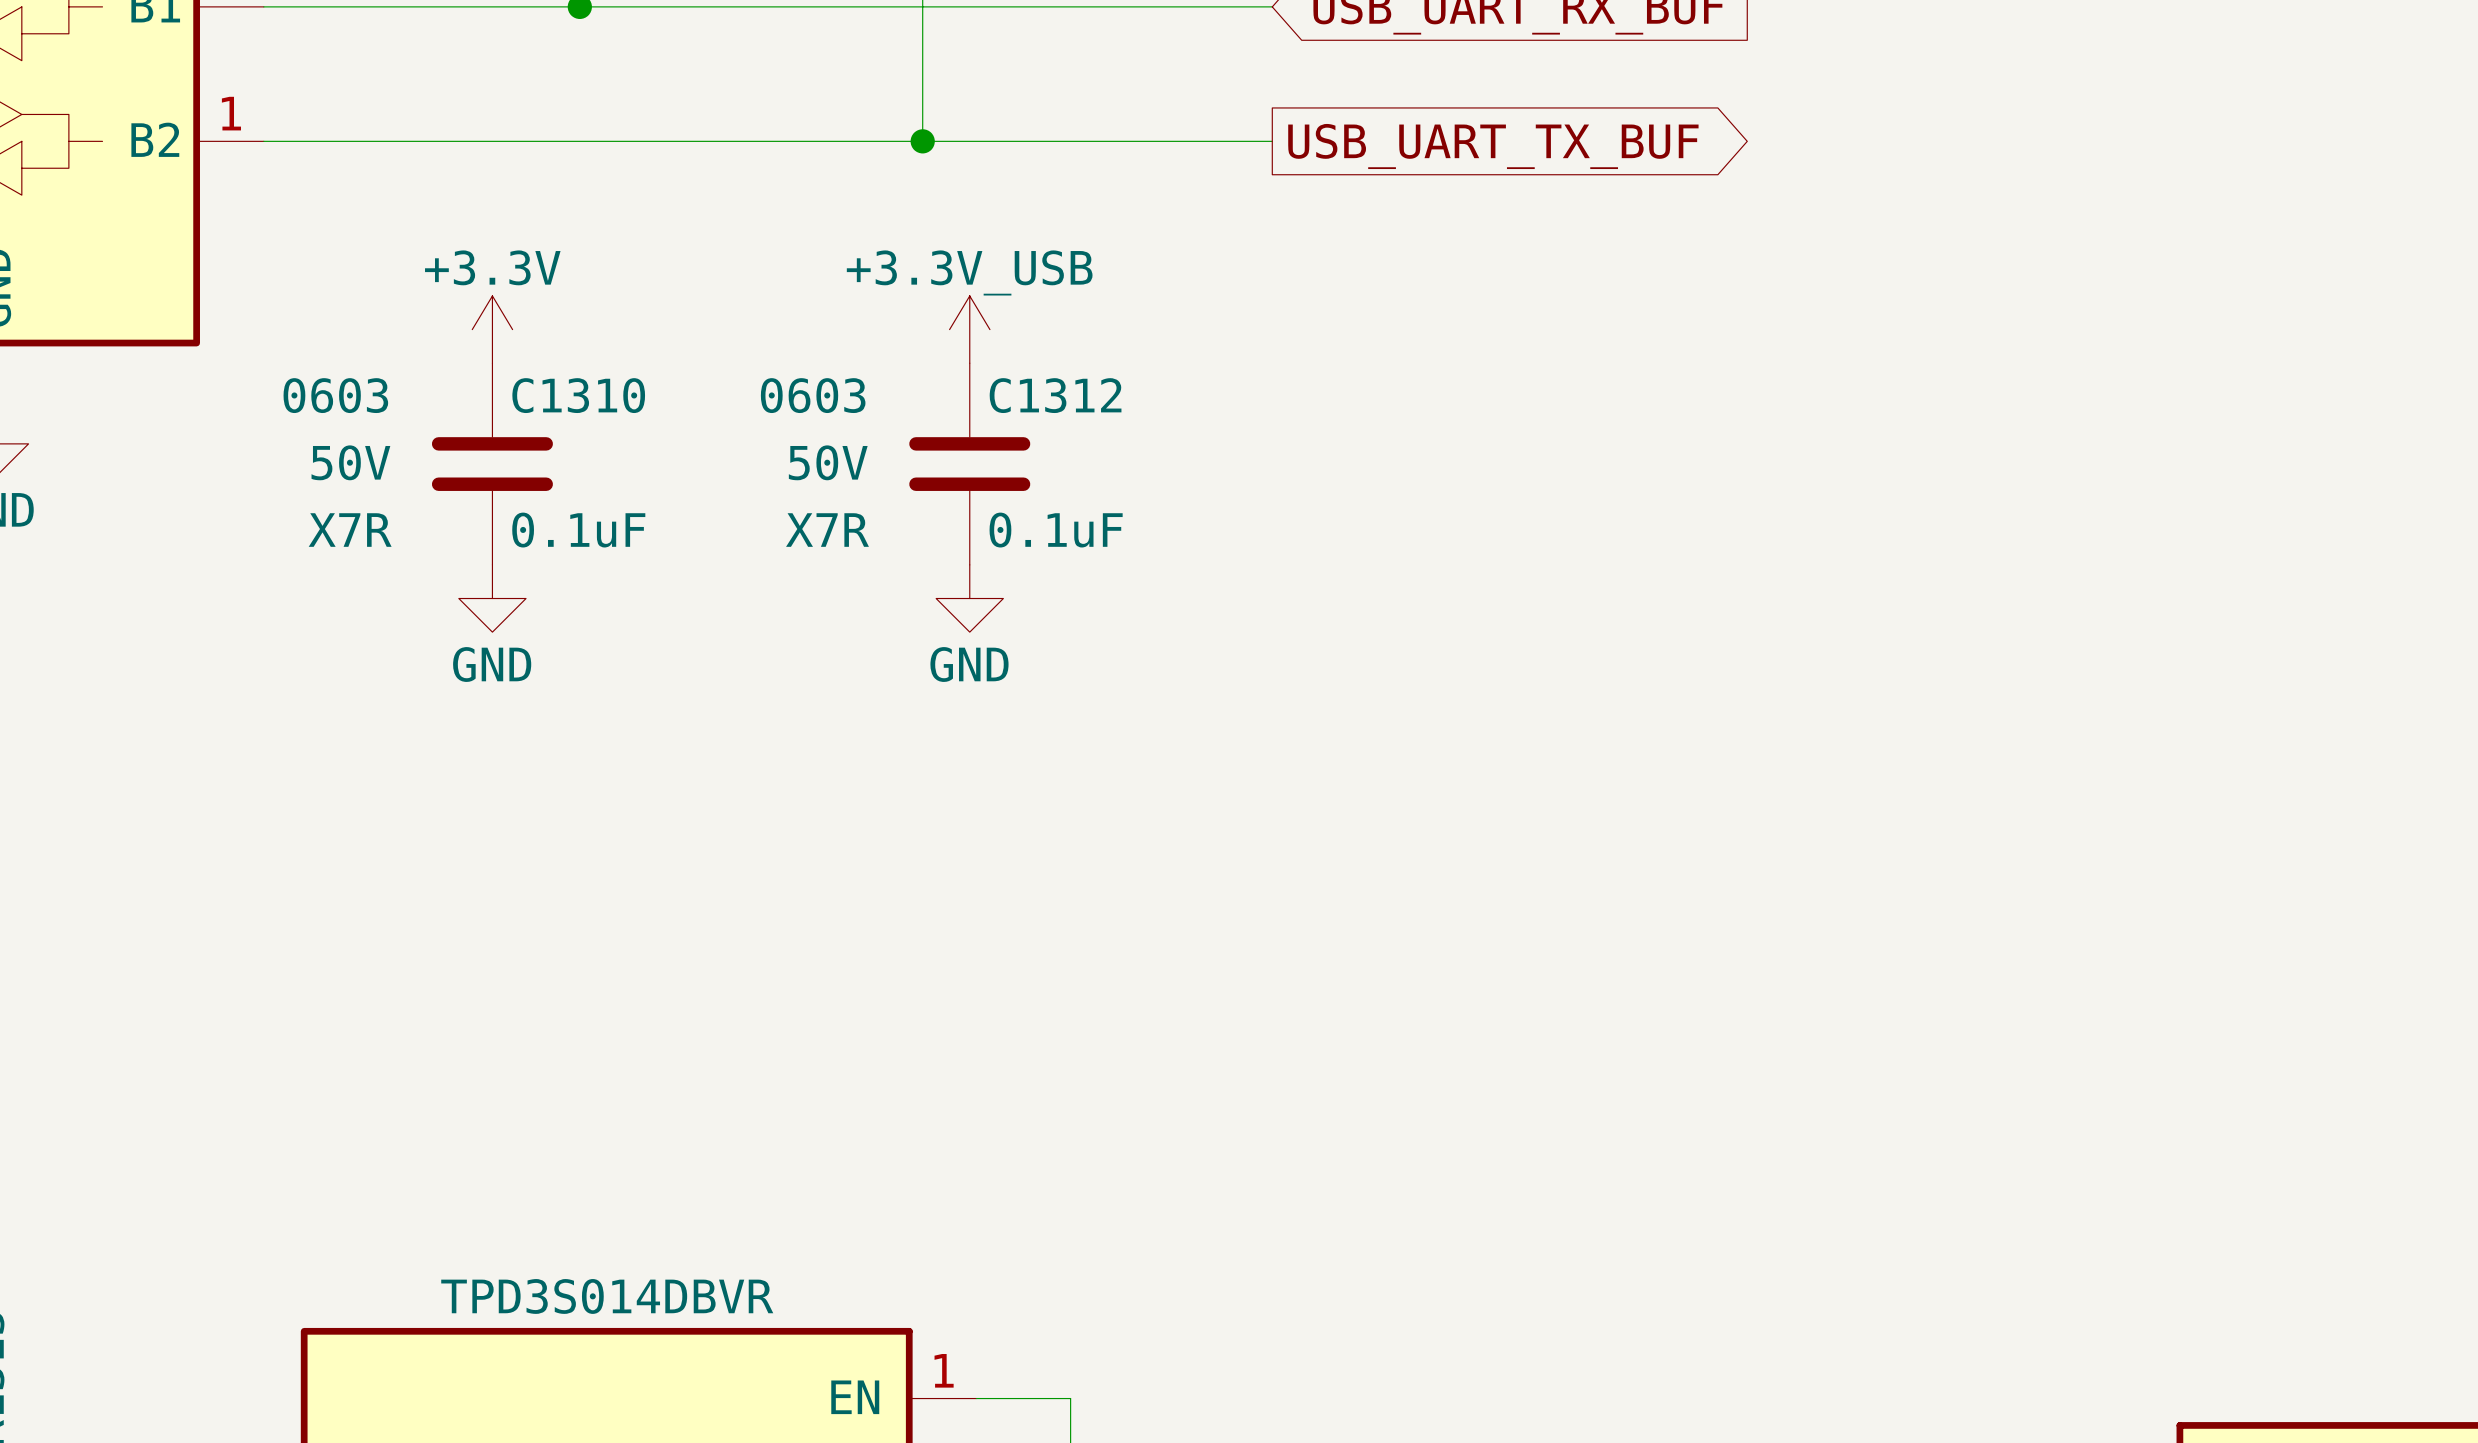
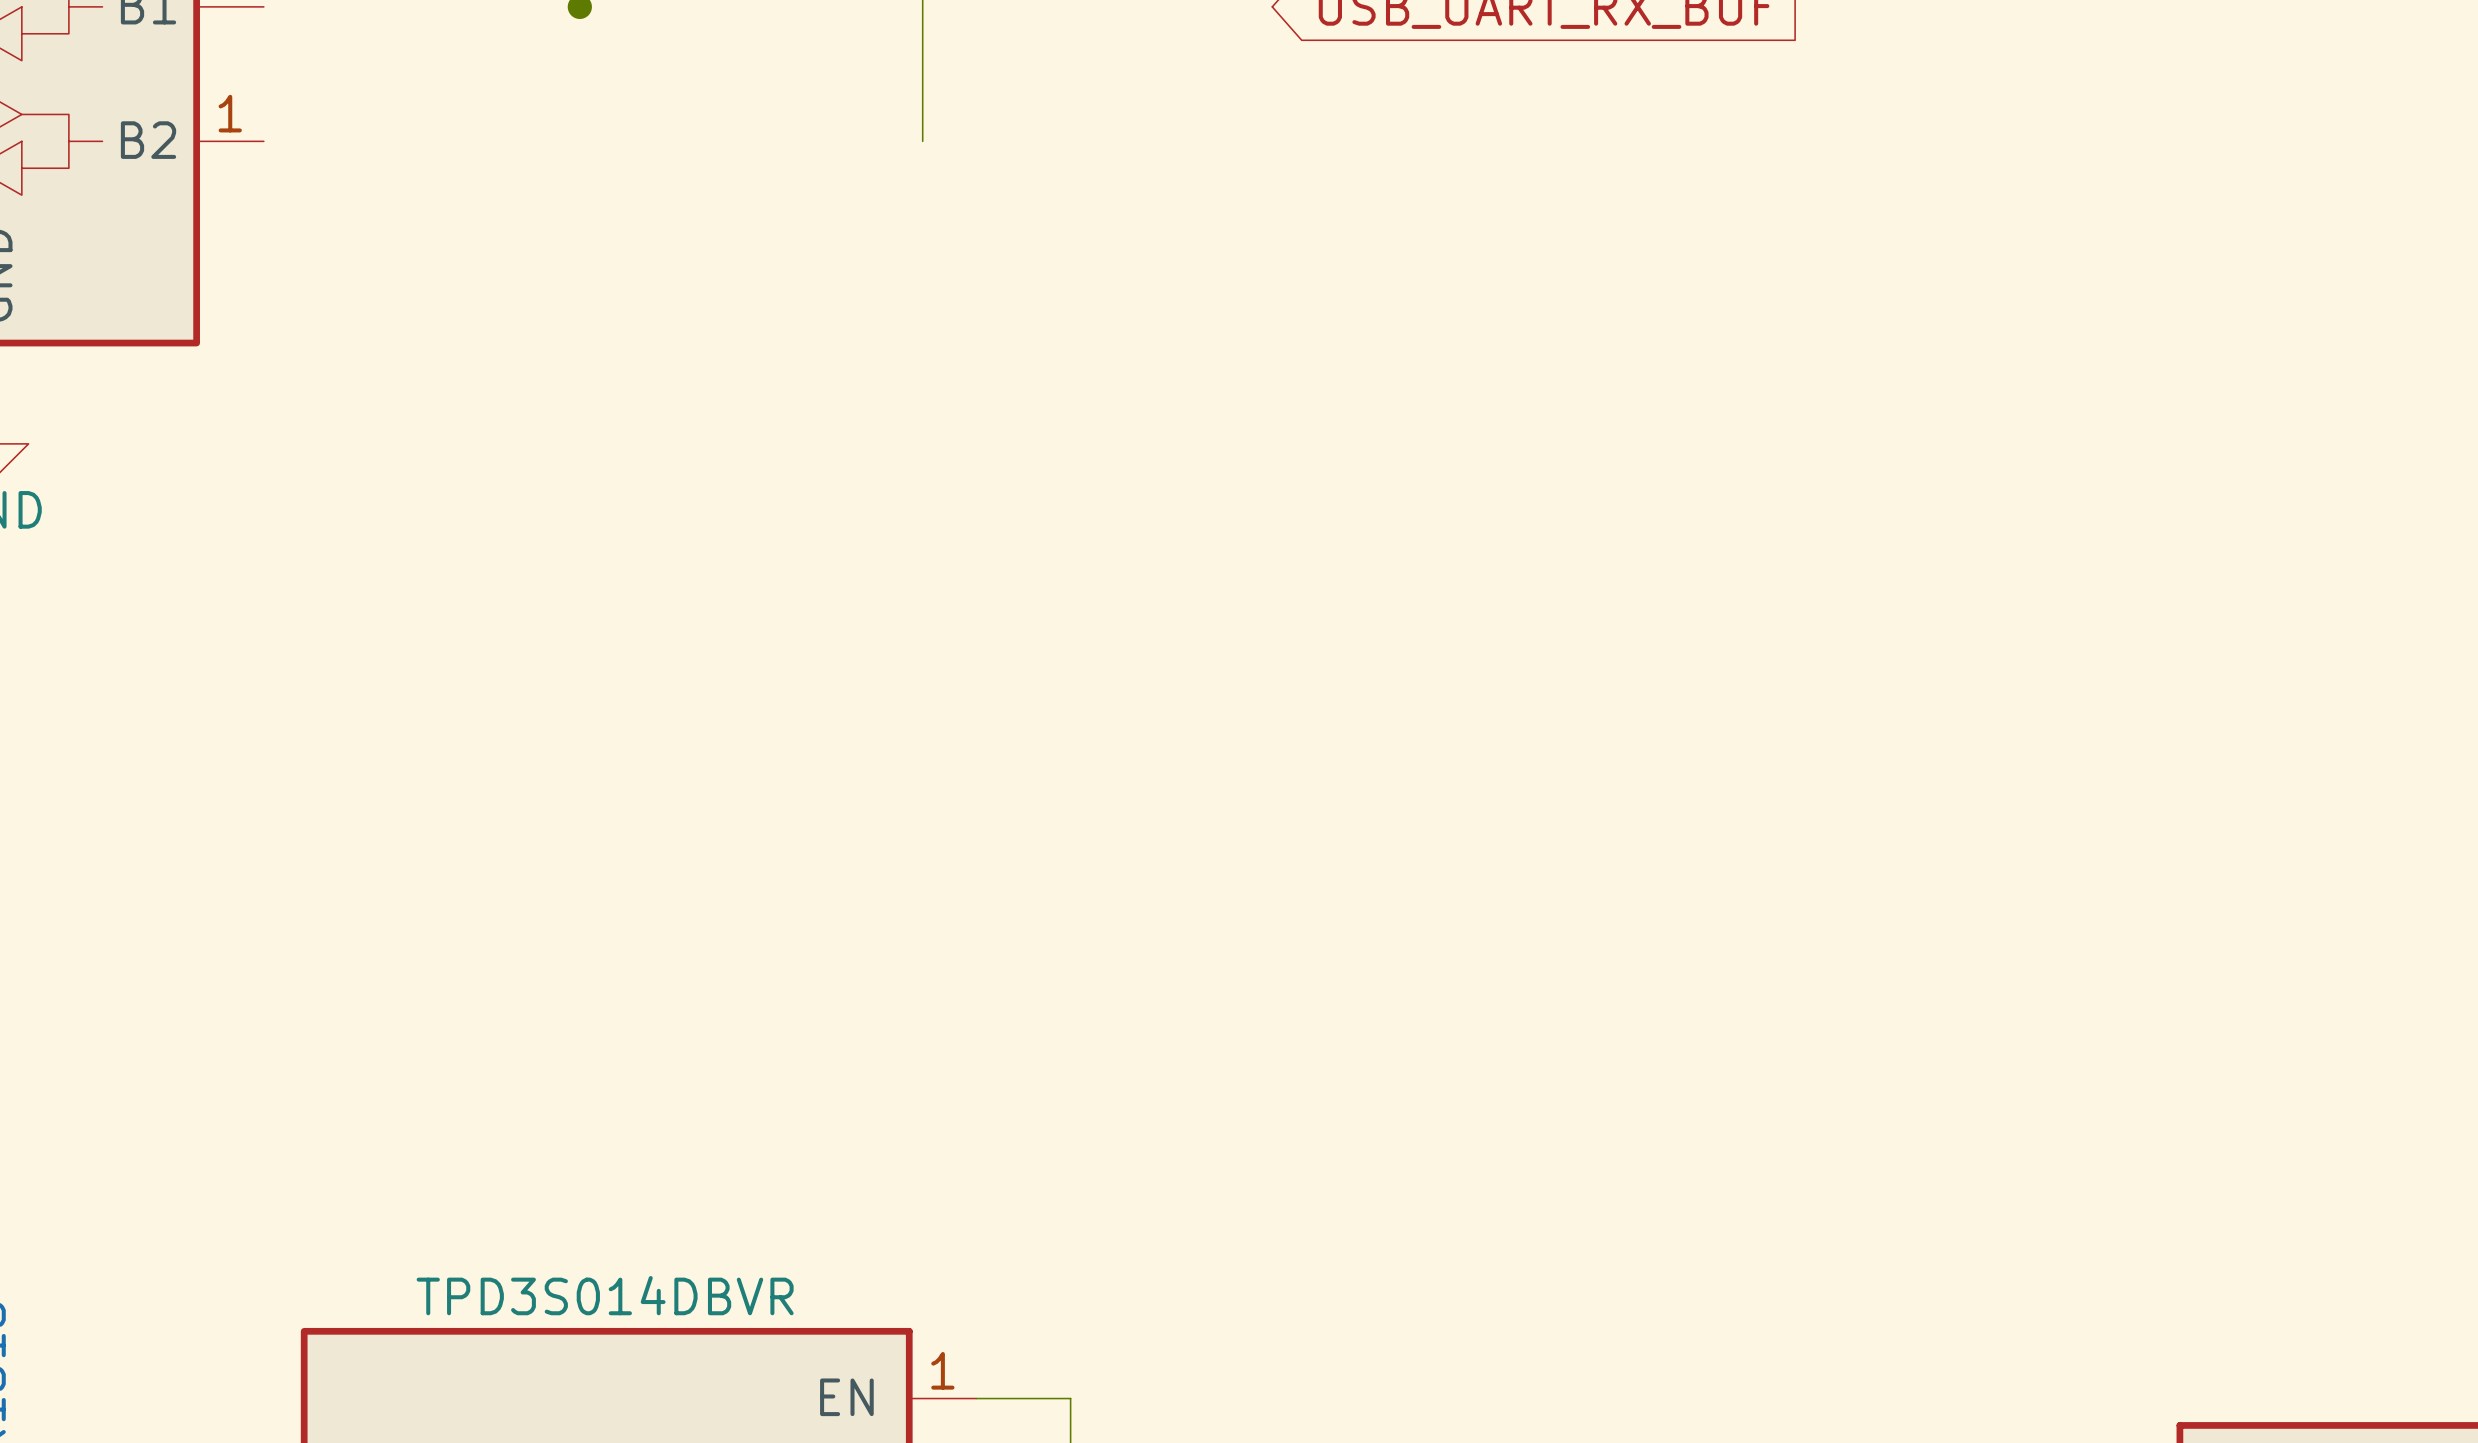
wire: (263, 6) (1272, 6) -> none
wire: (263, 141) (1272, 141) -> none
junction: (922, 141) -> none
global label: USB_UART_TX_BUF (1493, 146) -> none
power symbol: +3.3V (492, 329) -> none
power symbol: +3.3V_USB (969, 329) -> none
C1310: 0.1uF (492, 464) -> none
C1312: 0.1uF (969, 464) -> none
power symbol: GND (492, 598) -> none
power symbol: GND (969, 598) -> none

